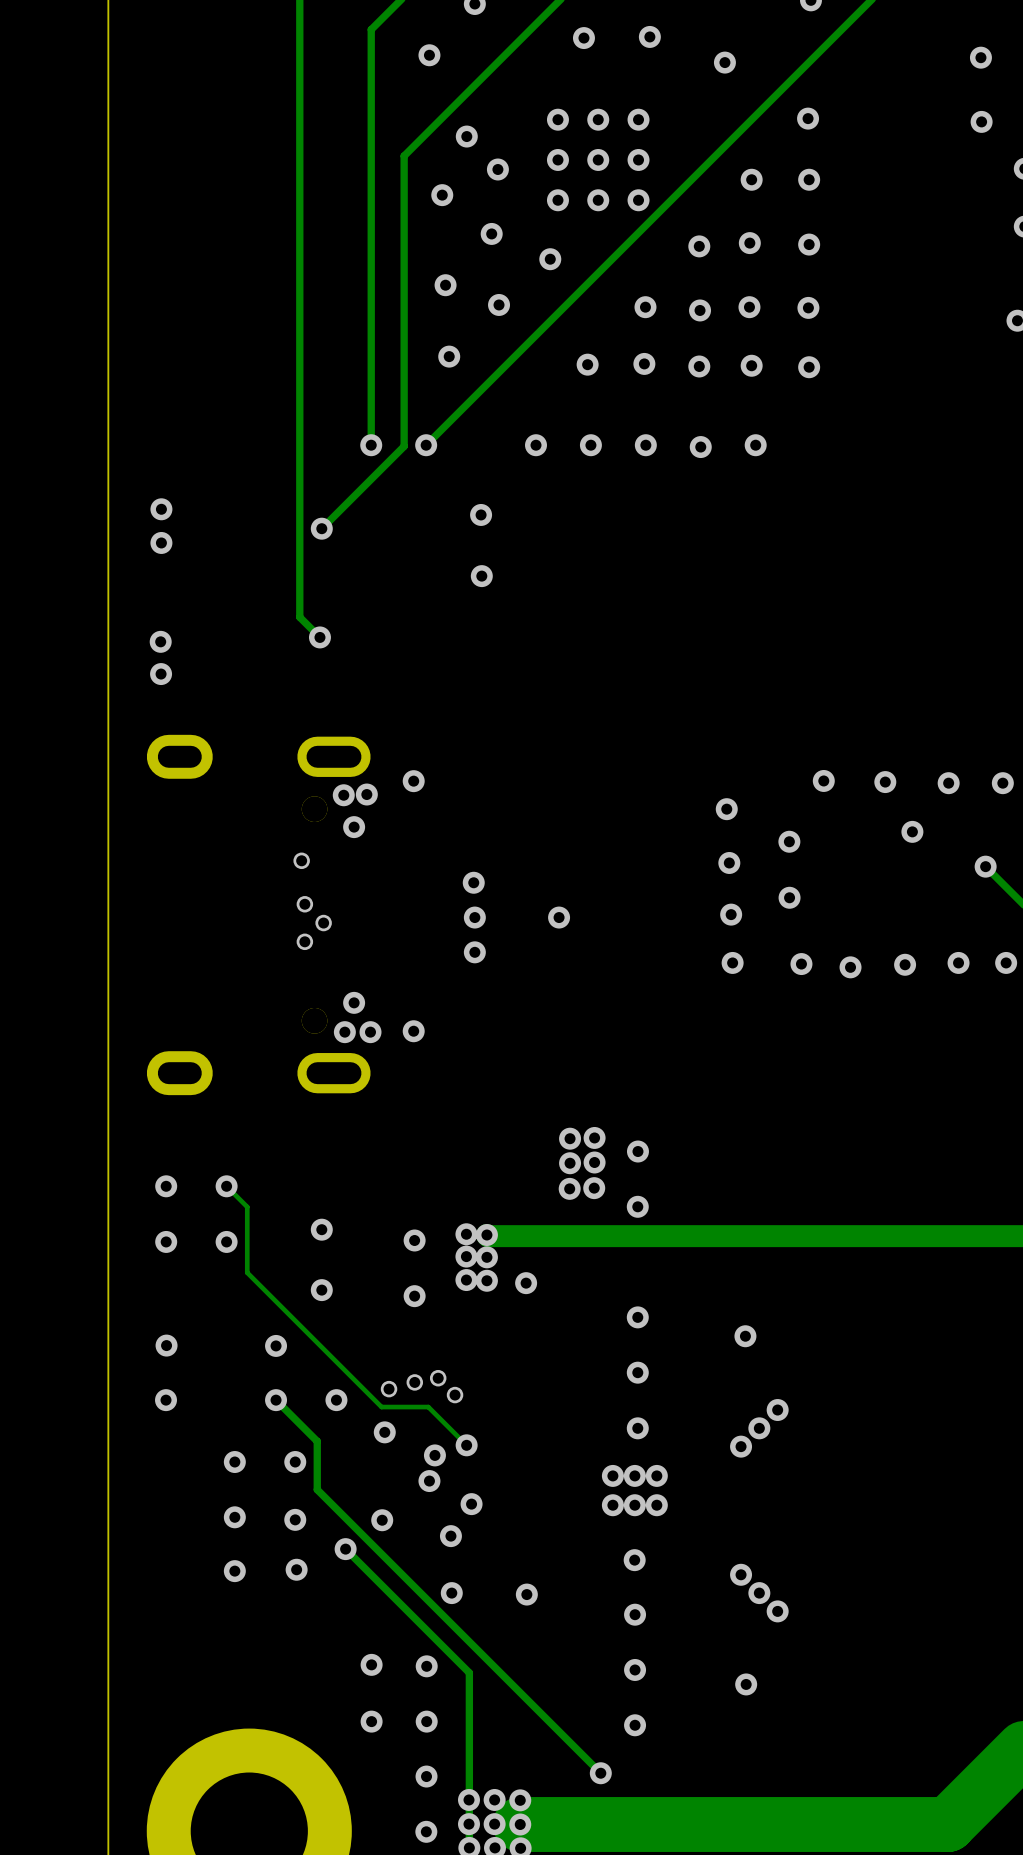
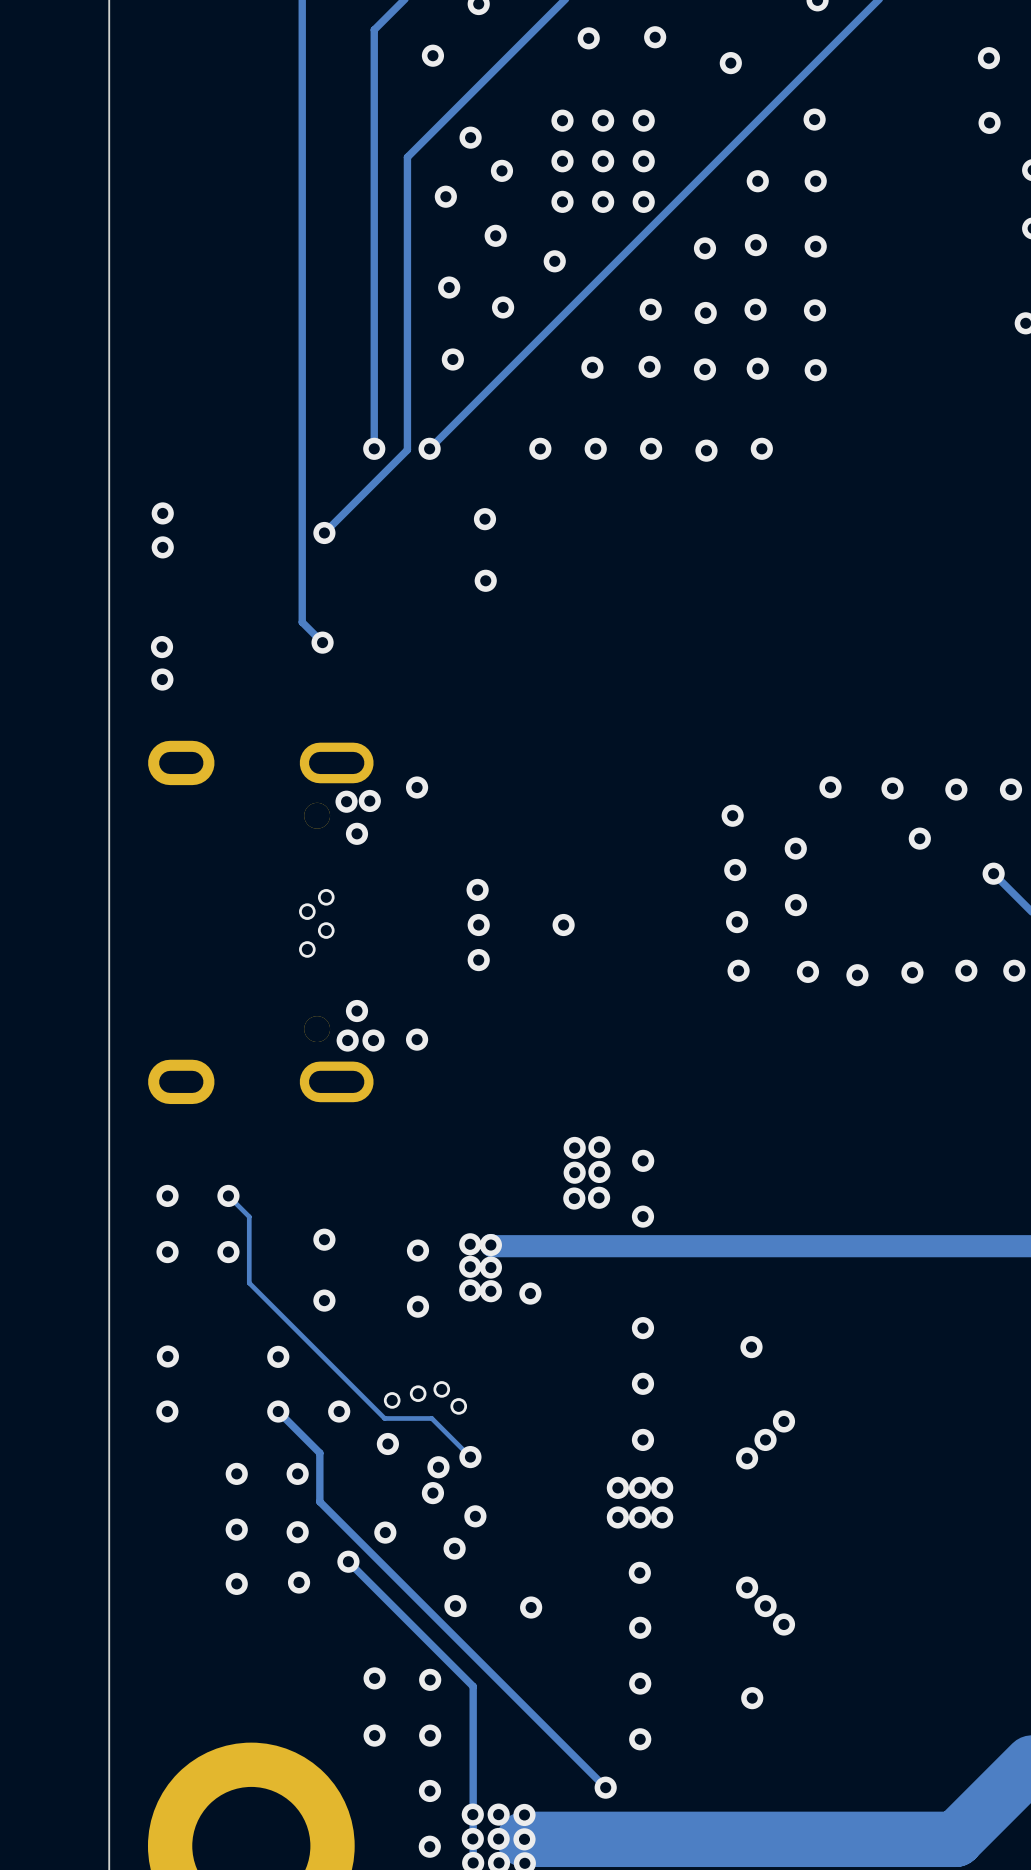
via position: (301, 860) -> (326, 897)

